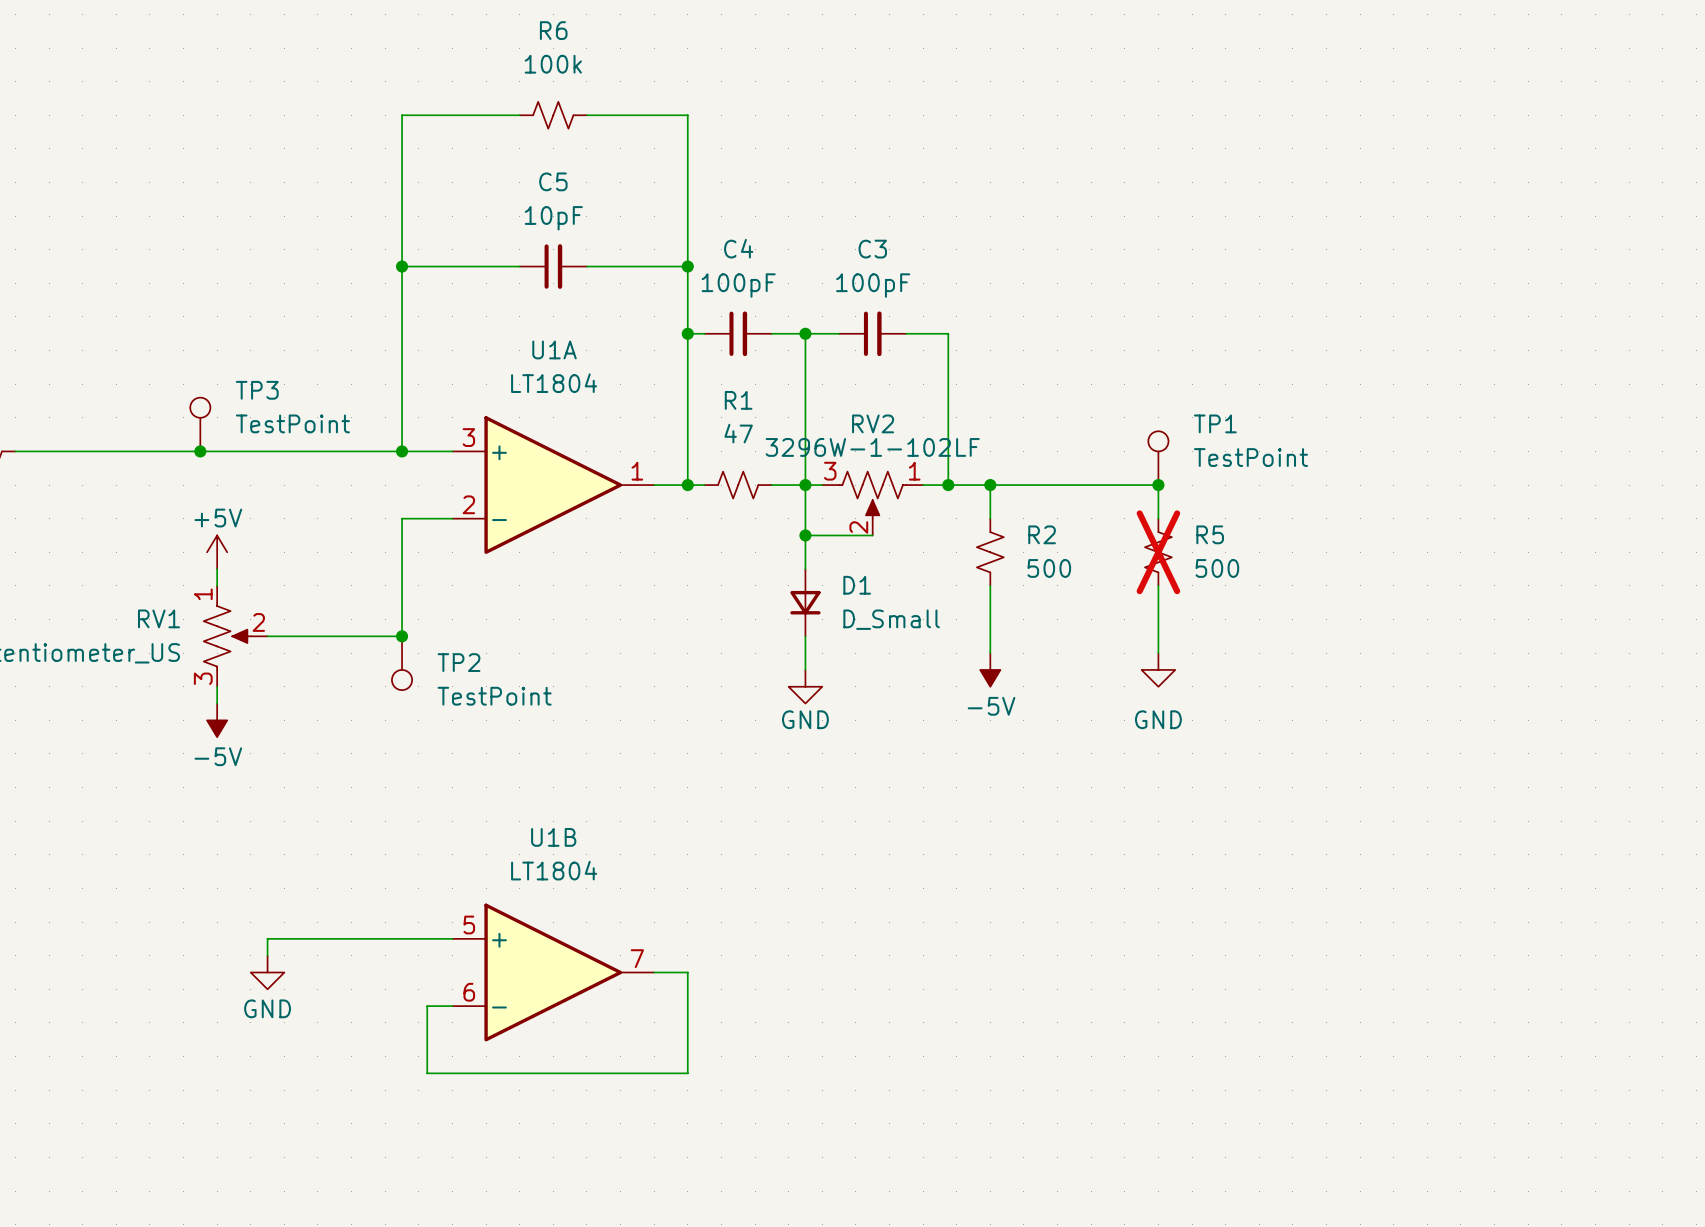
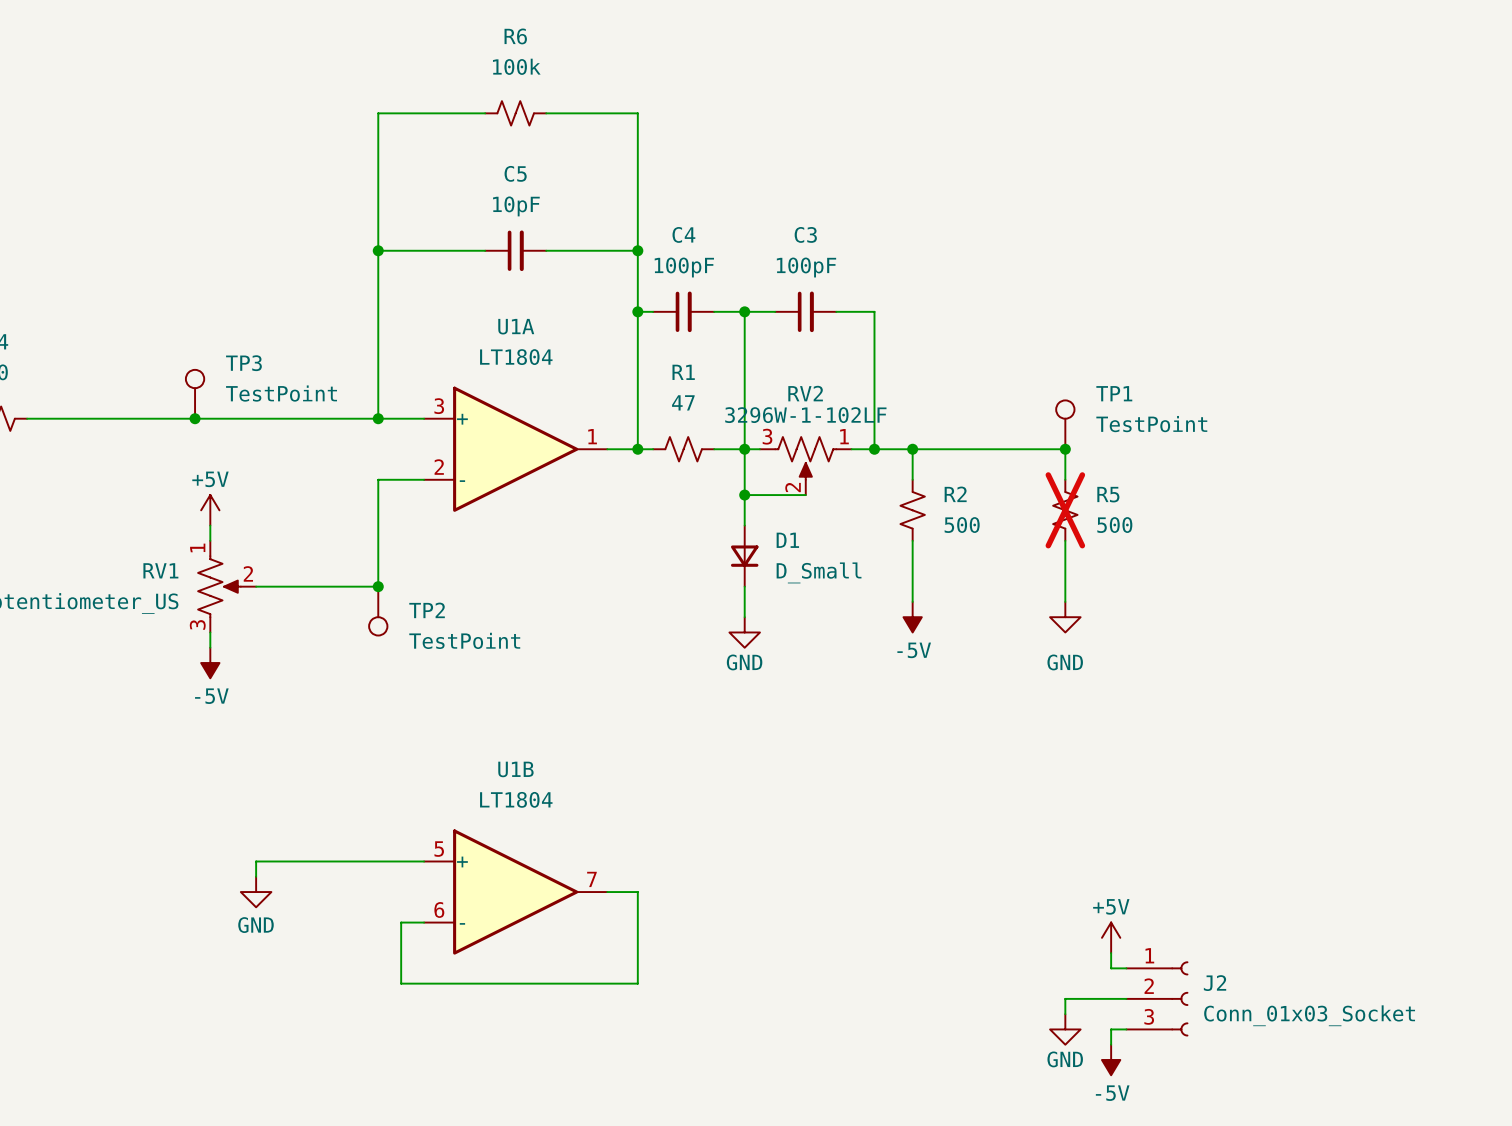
power symbol: none -> +5V (1111, 937)
wire: none -> (1111, 953) (1111, 968) (1126, 968)
wire: none -> (1126, 998) (1065, 998) (1065, 1014)
J2: none -> Conn_01x03_Socket (1157, 998)
power symbol: none -> GND (1065, 1029)
wire: none -> (1126, 1029) (1111, 1029) (1111, 1044)
power symbol: none -> -5V (1111, 1059)

